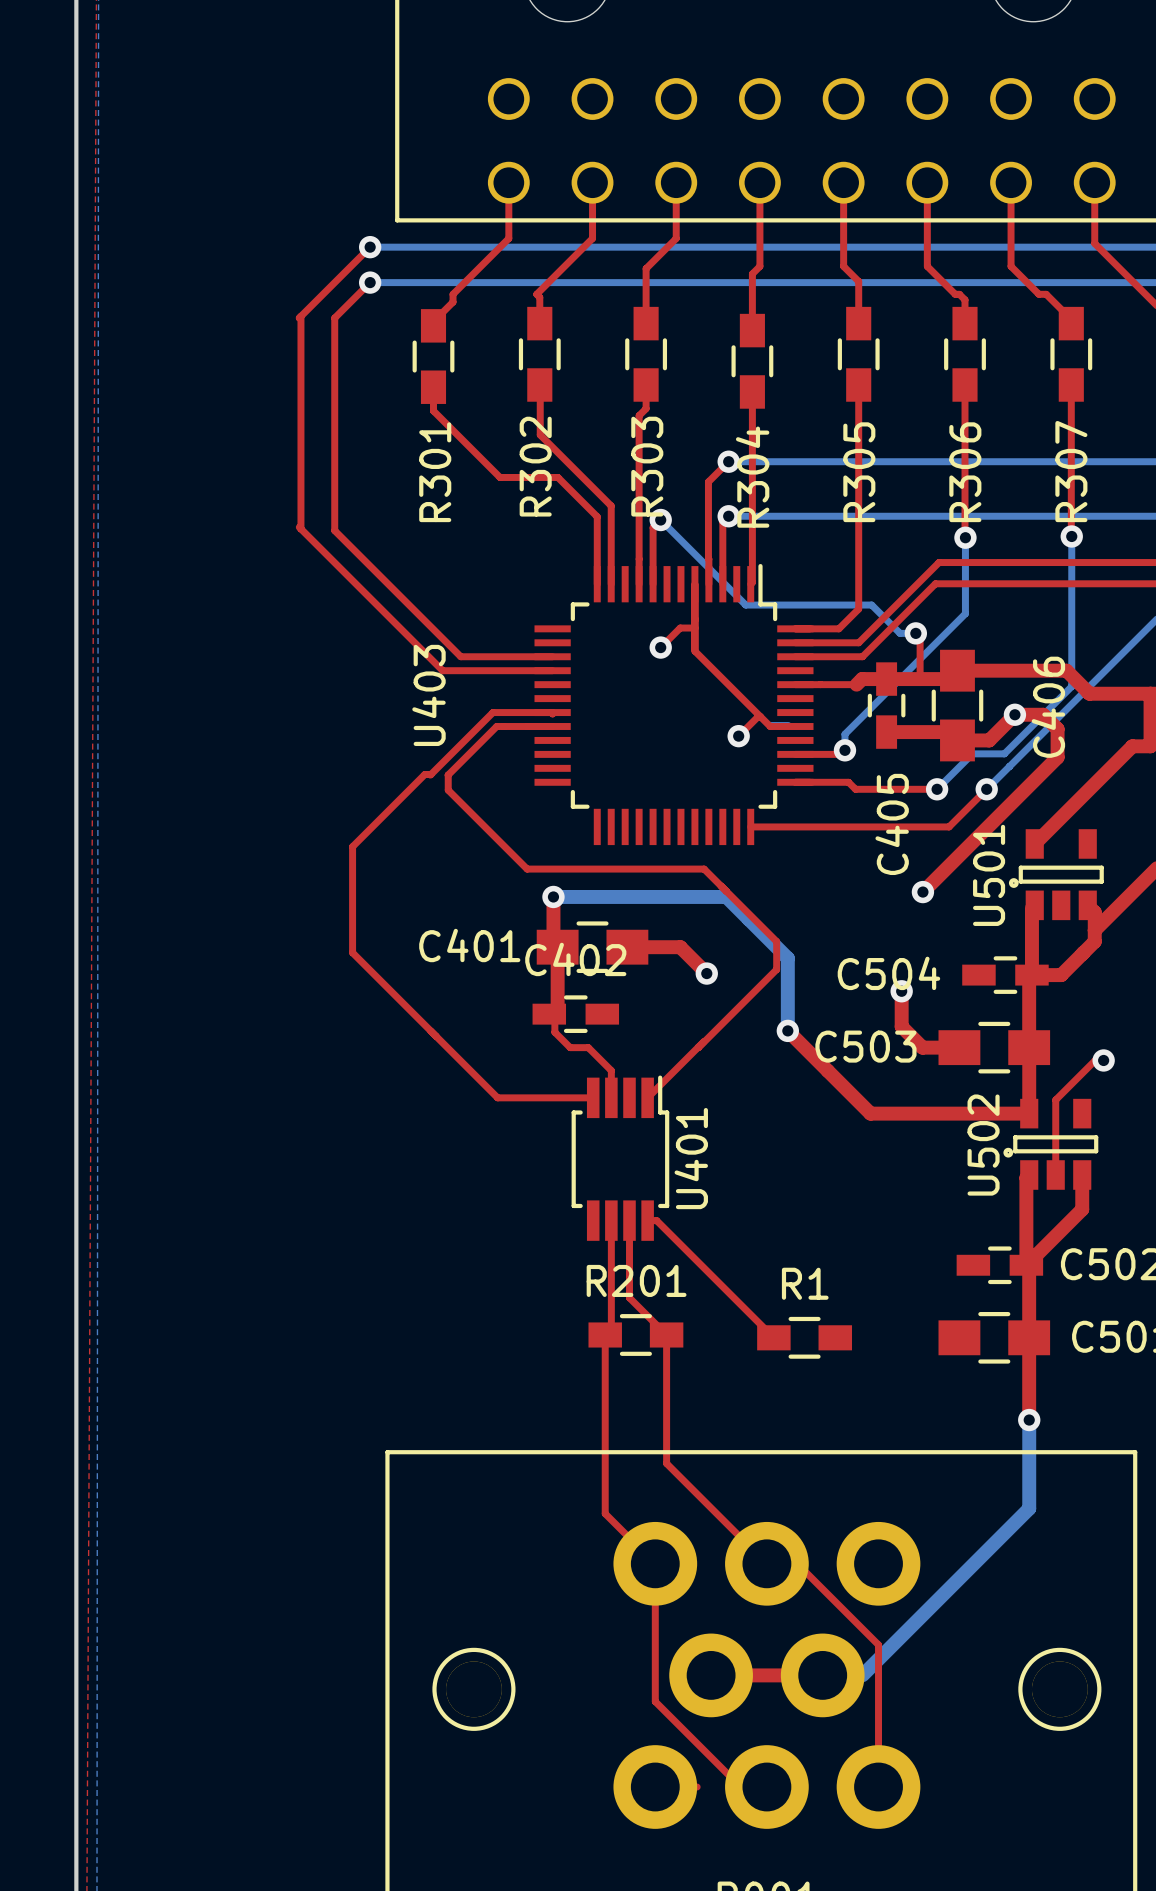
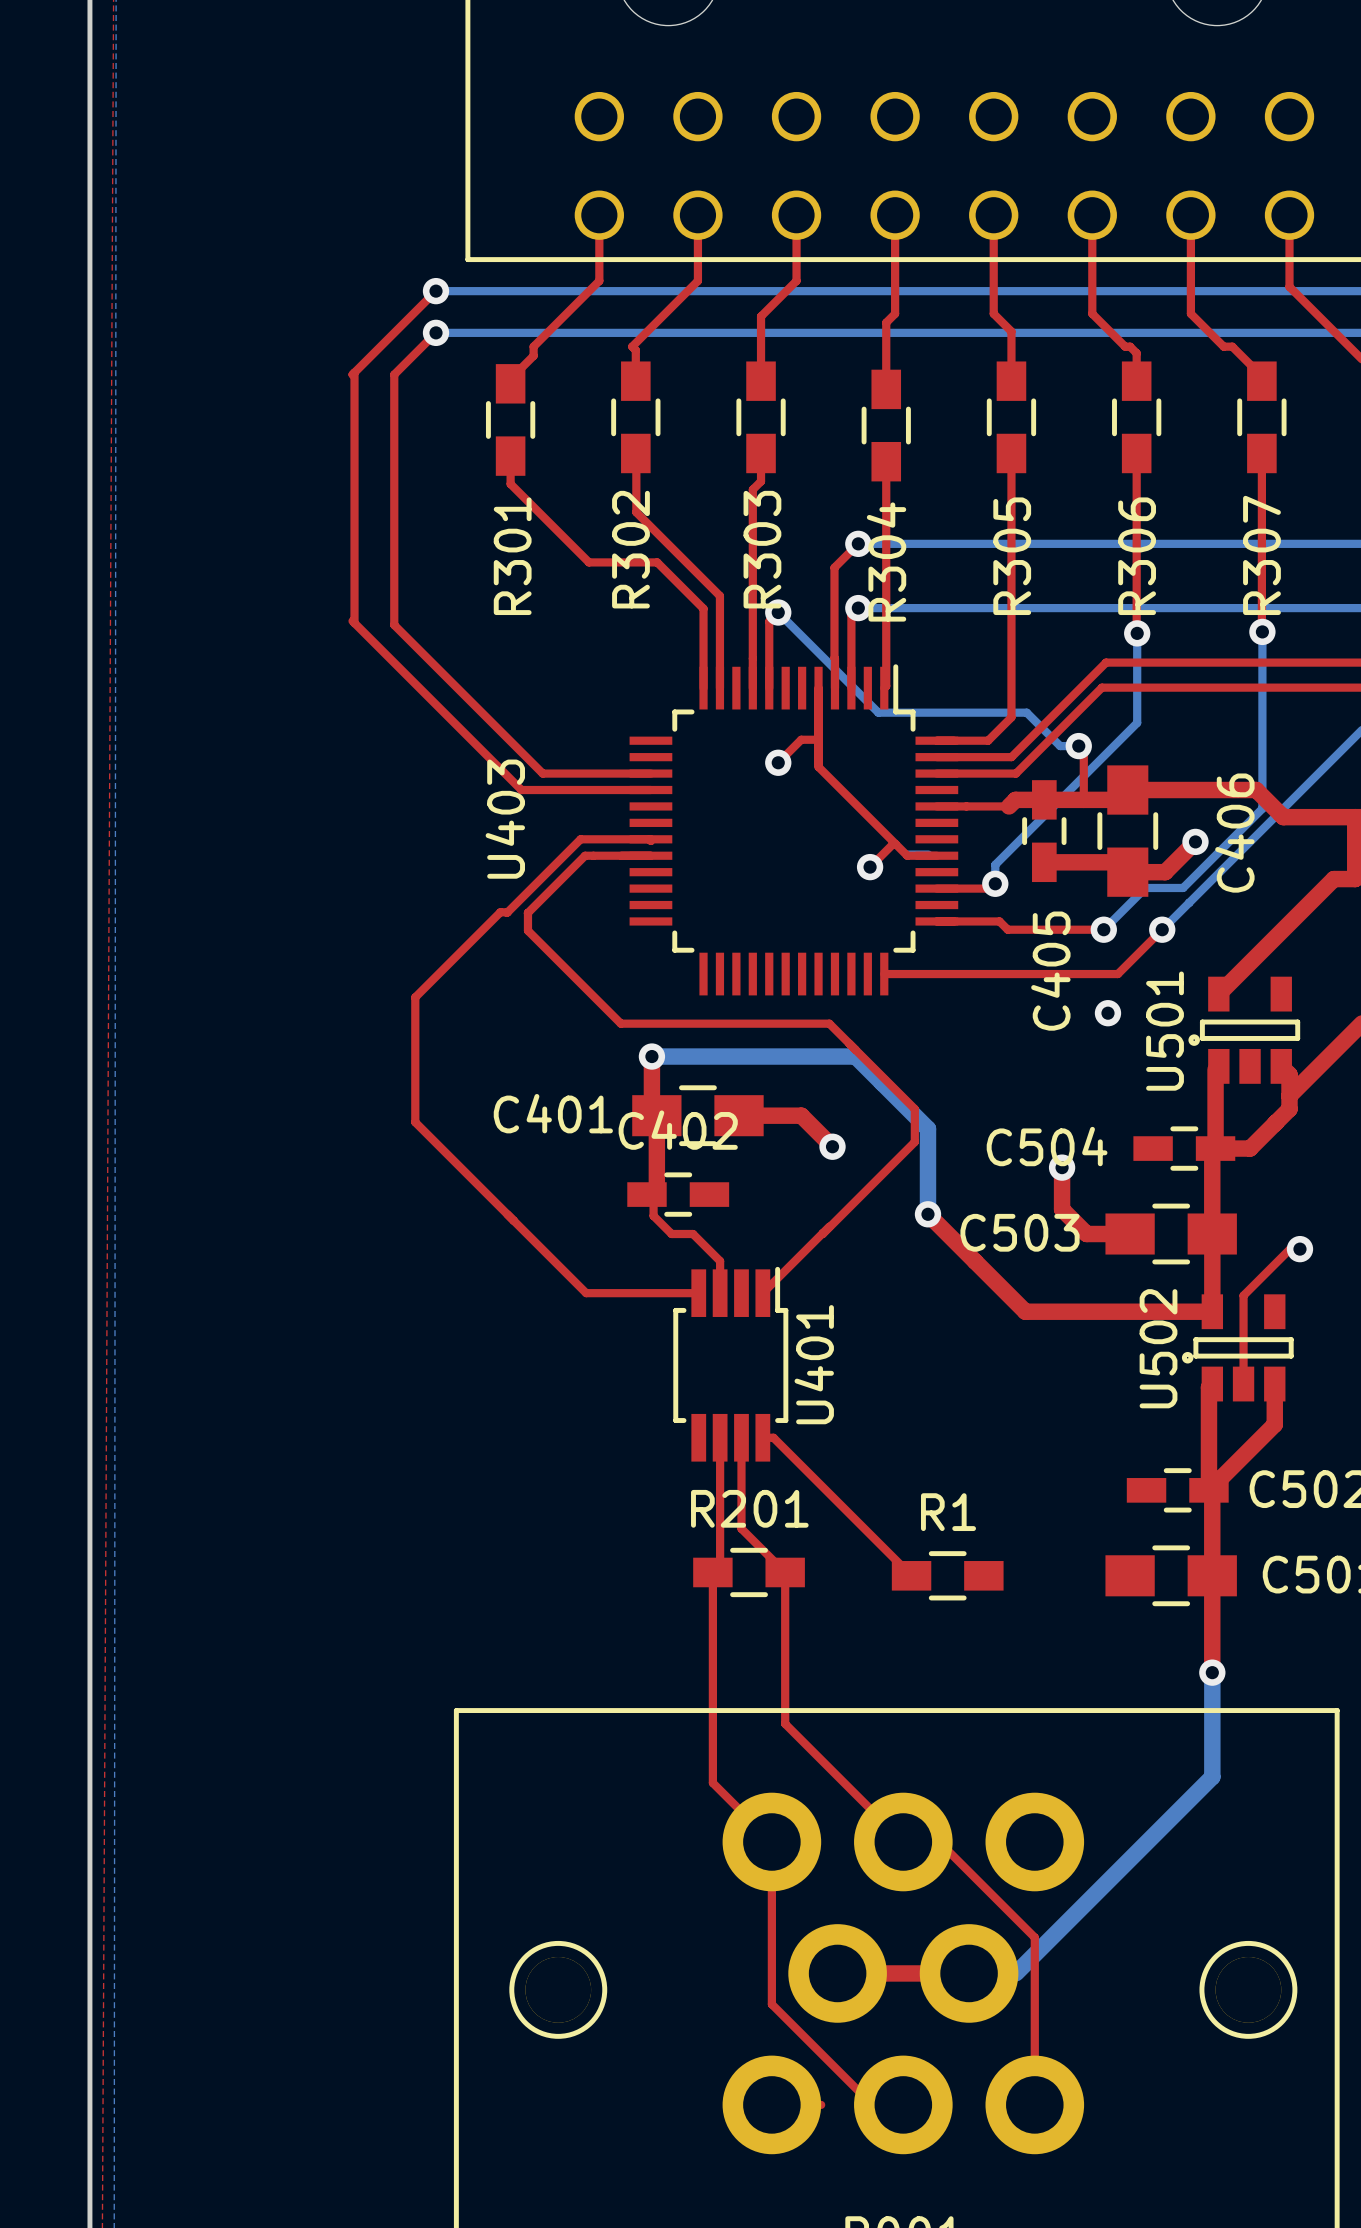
top track: (1014, 714) (1043, 714) (1057, 729) (1057, 757) (922, 892) -> none
via position: (922, 892) -> (1107, 1013)

